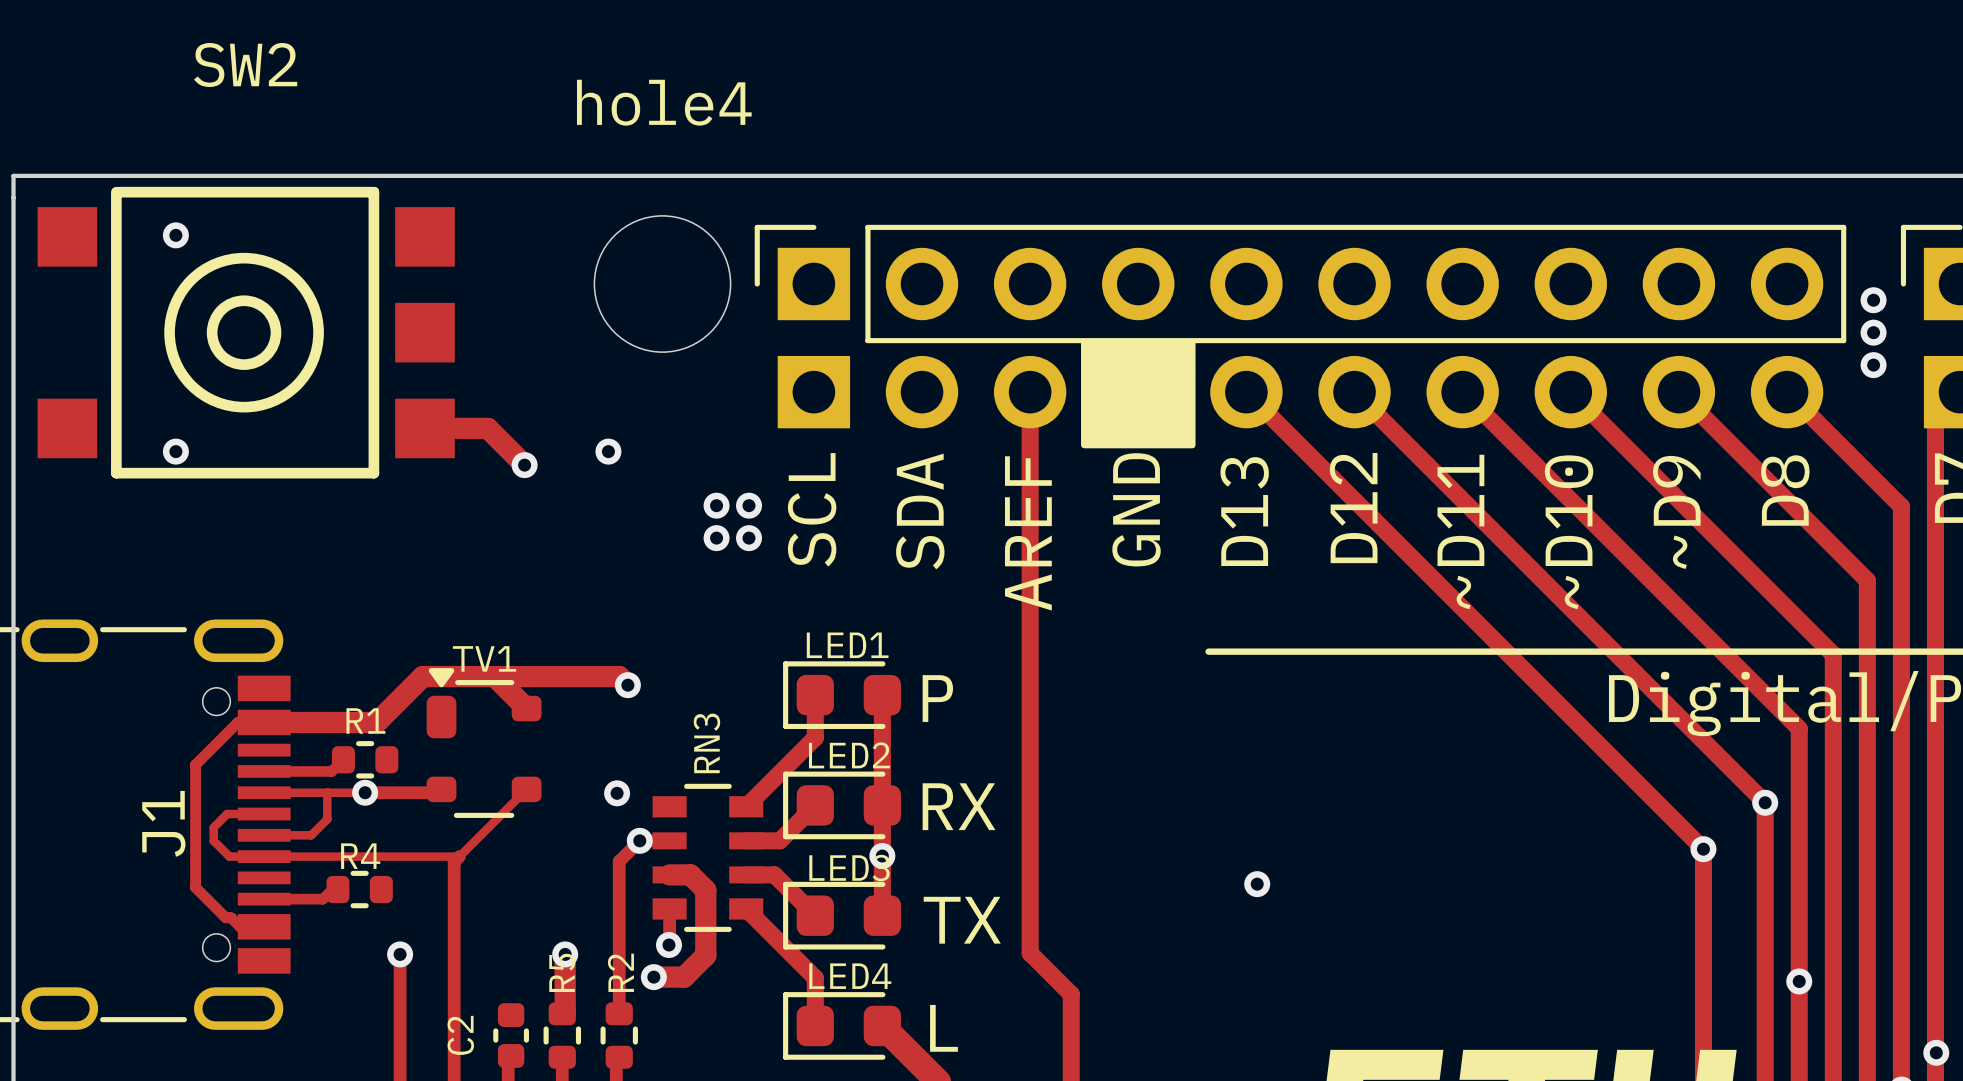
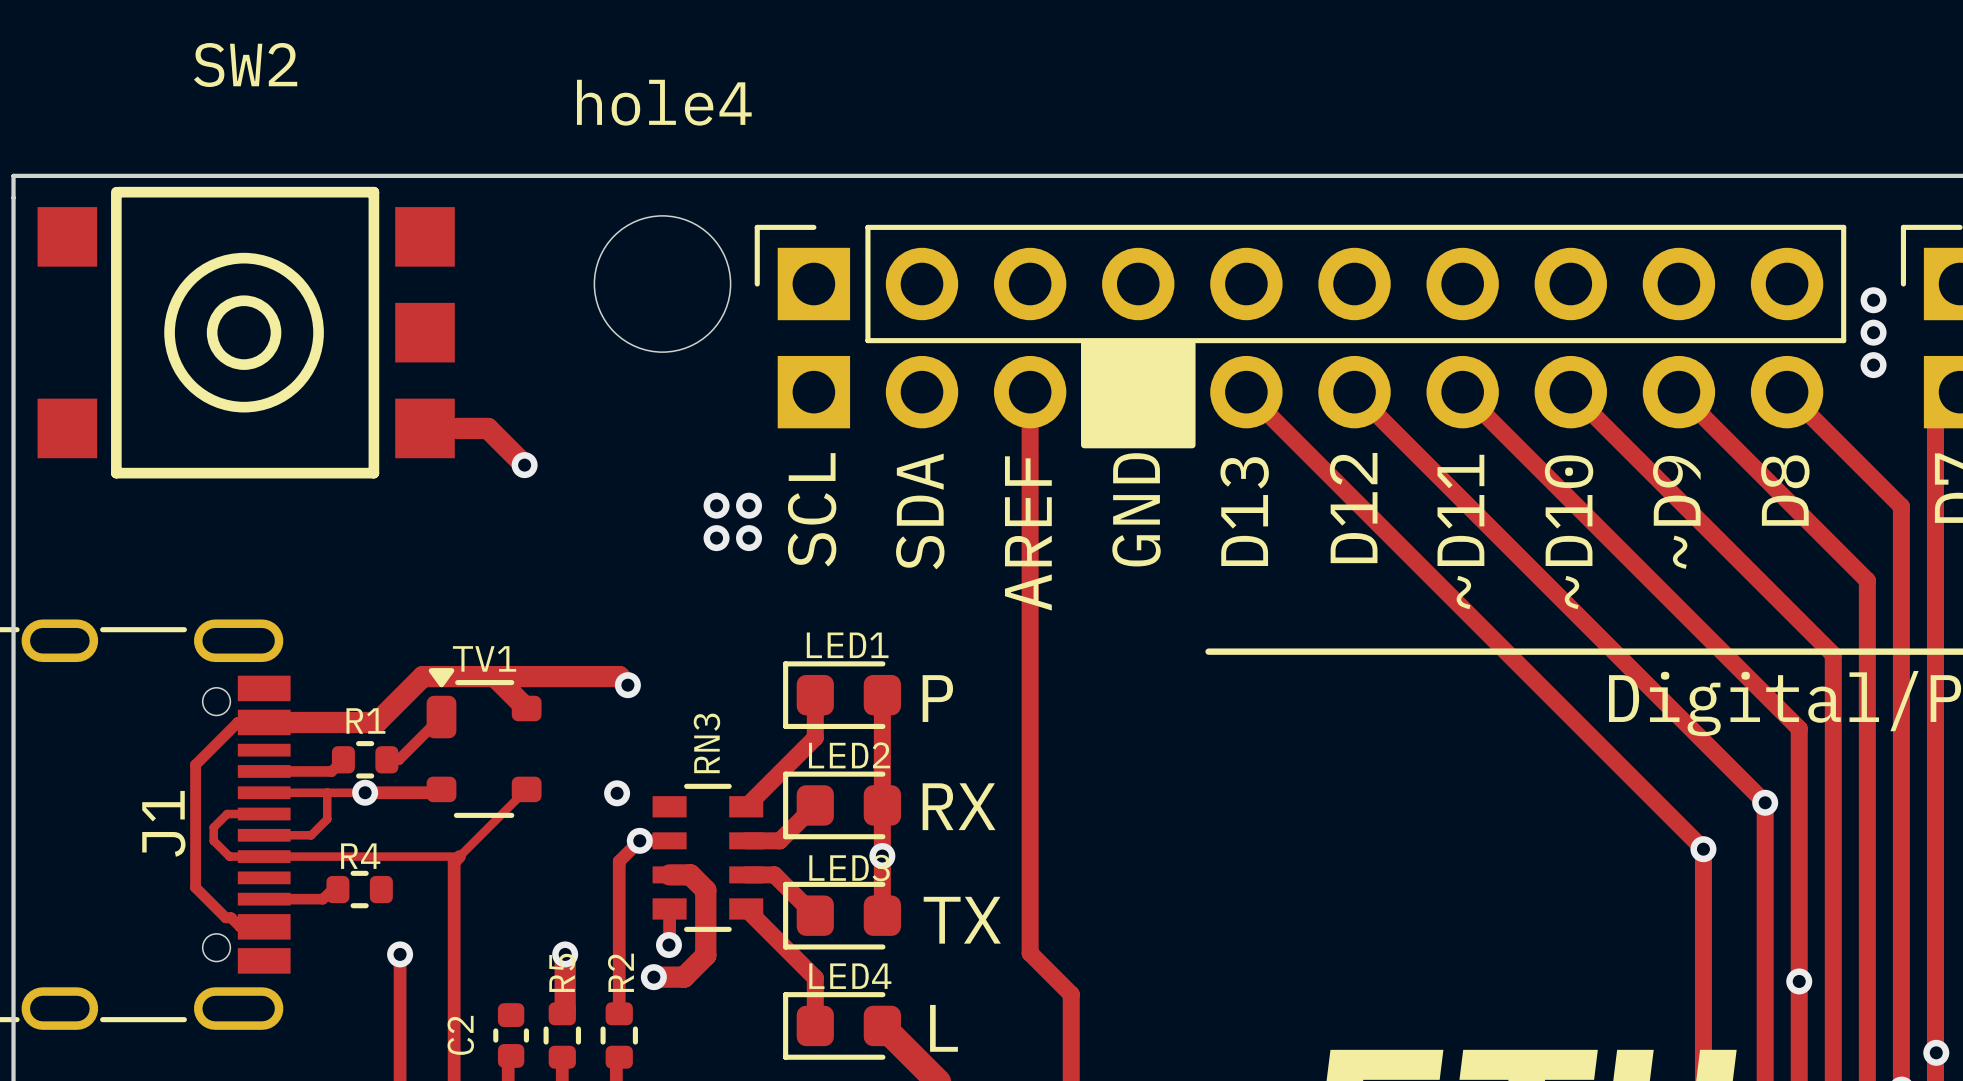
via: (175, 235) -> none
via: (175, 451) -> none
via: (608, 451) -> none
track: none -> (441, 717) (398, 759) (386, 759)
via: (1257, 884) -> none

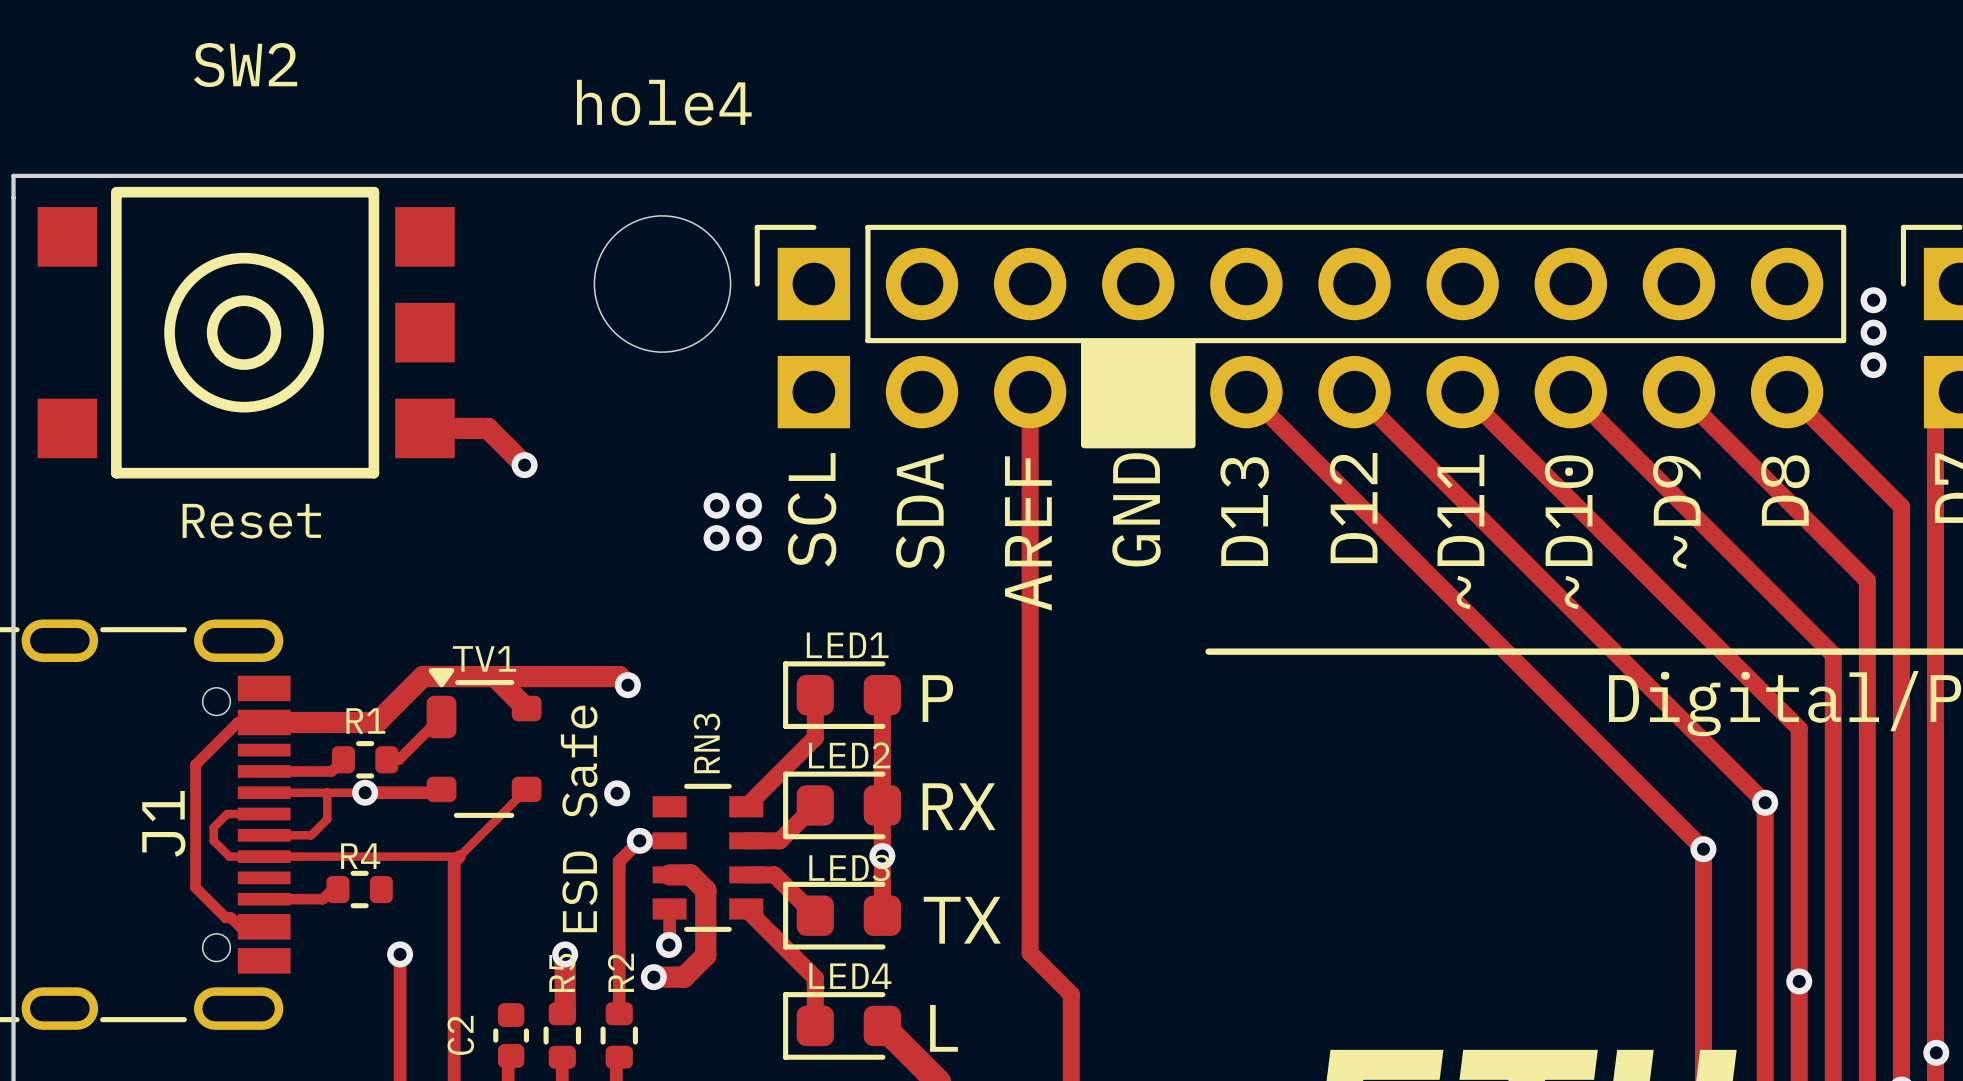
text: none -> Reset (251, 521)
text: none -> ESD Safe (579, 818)

